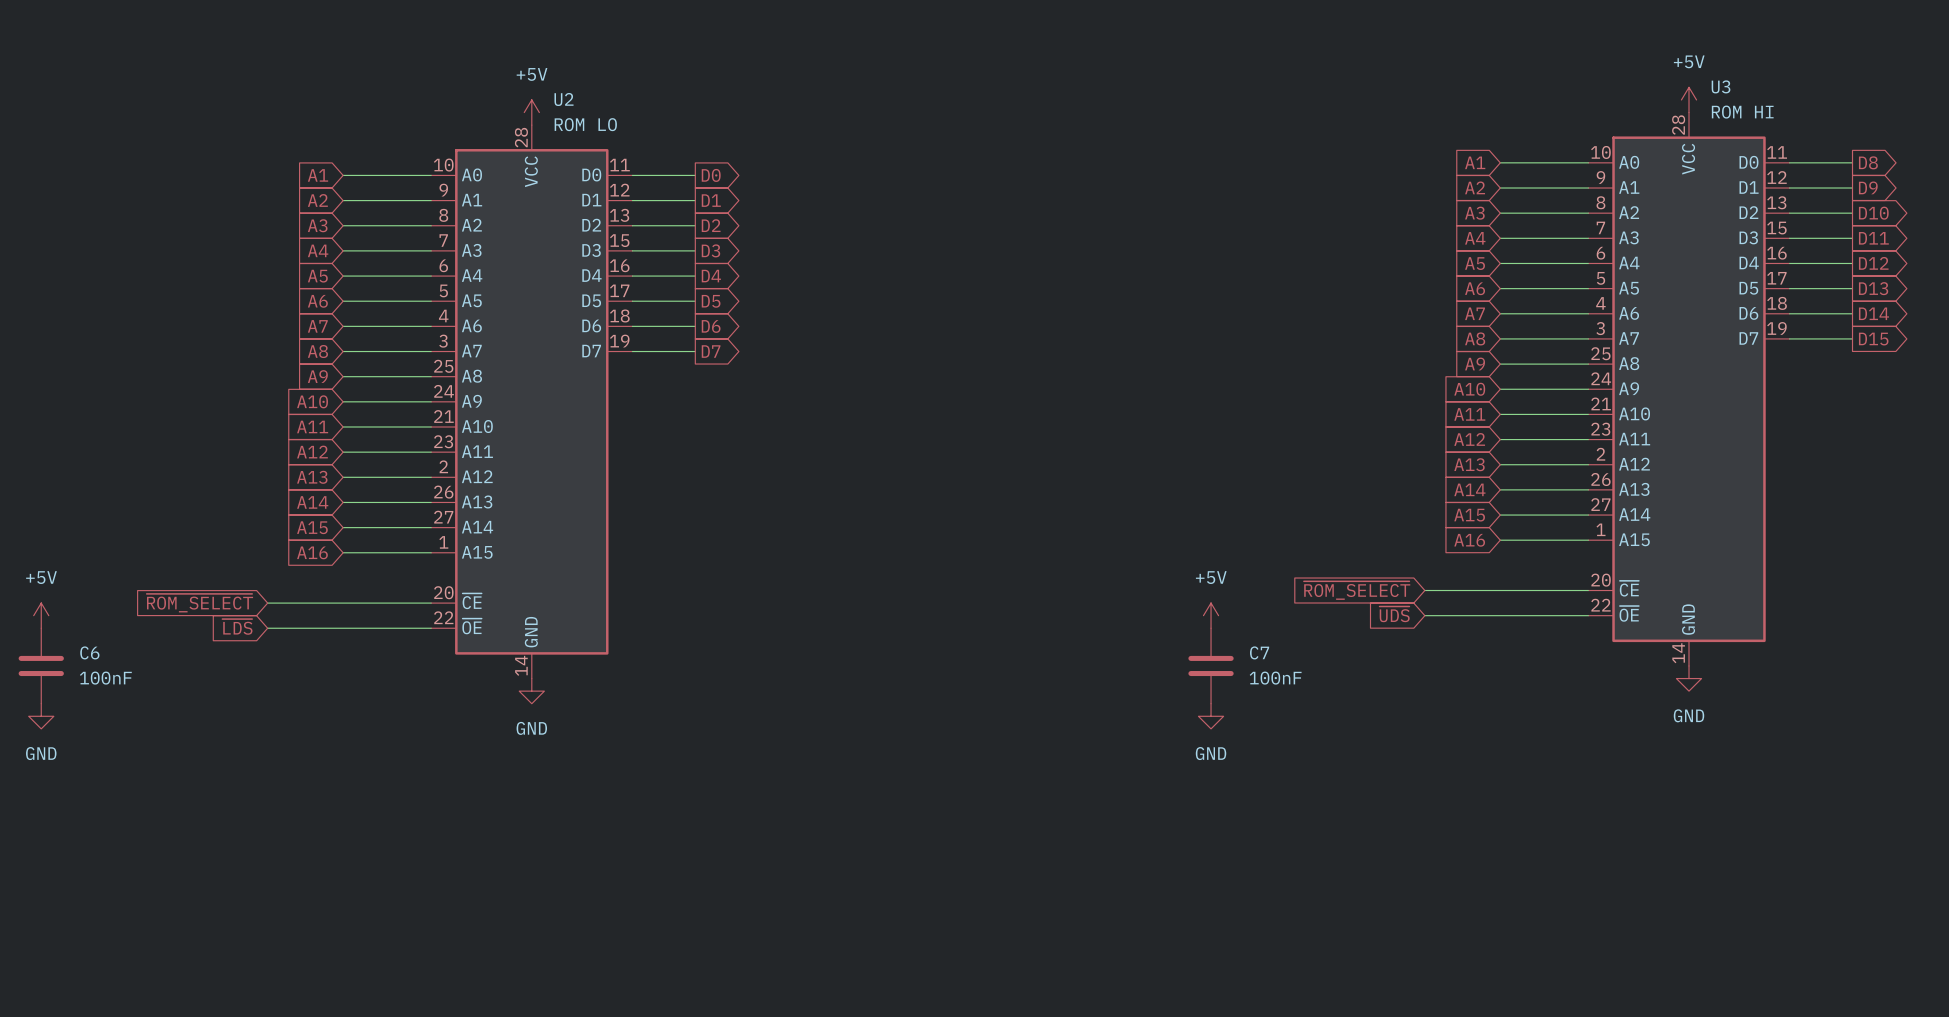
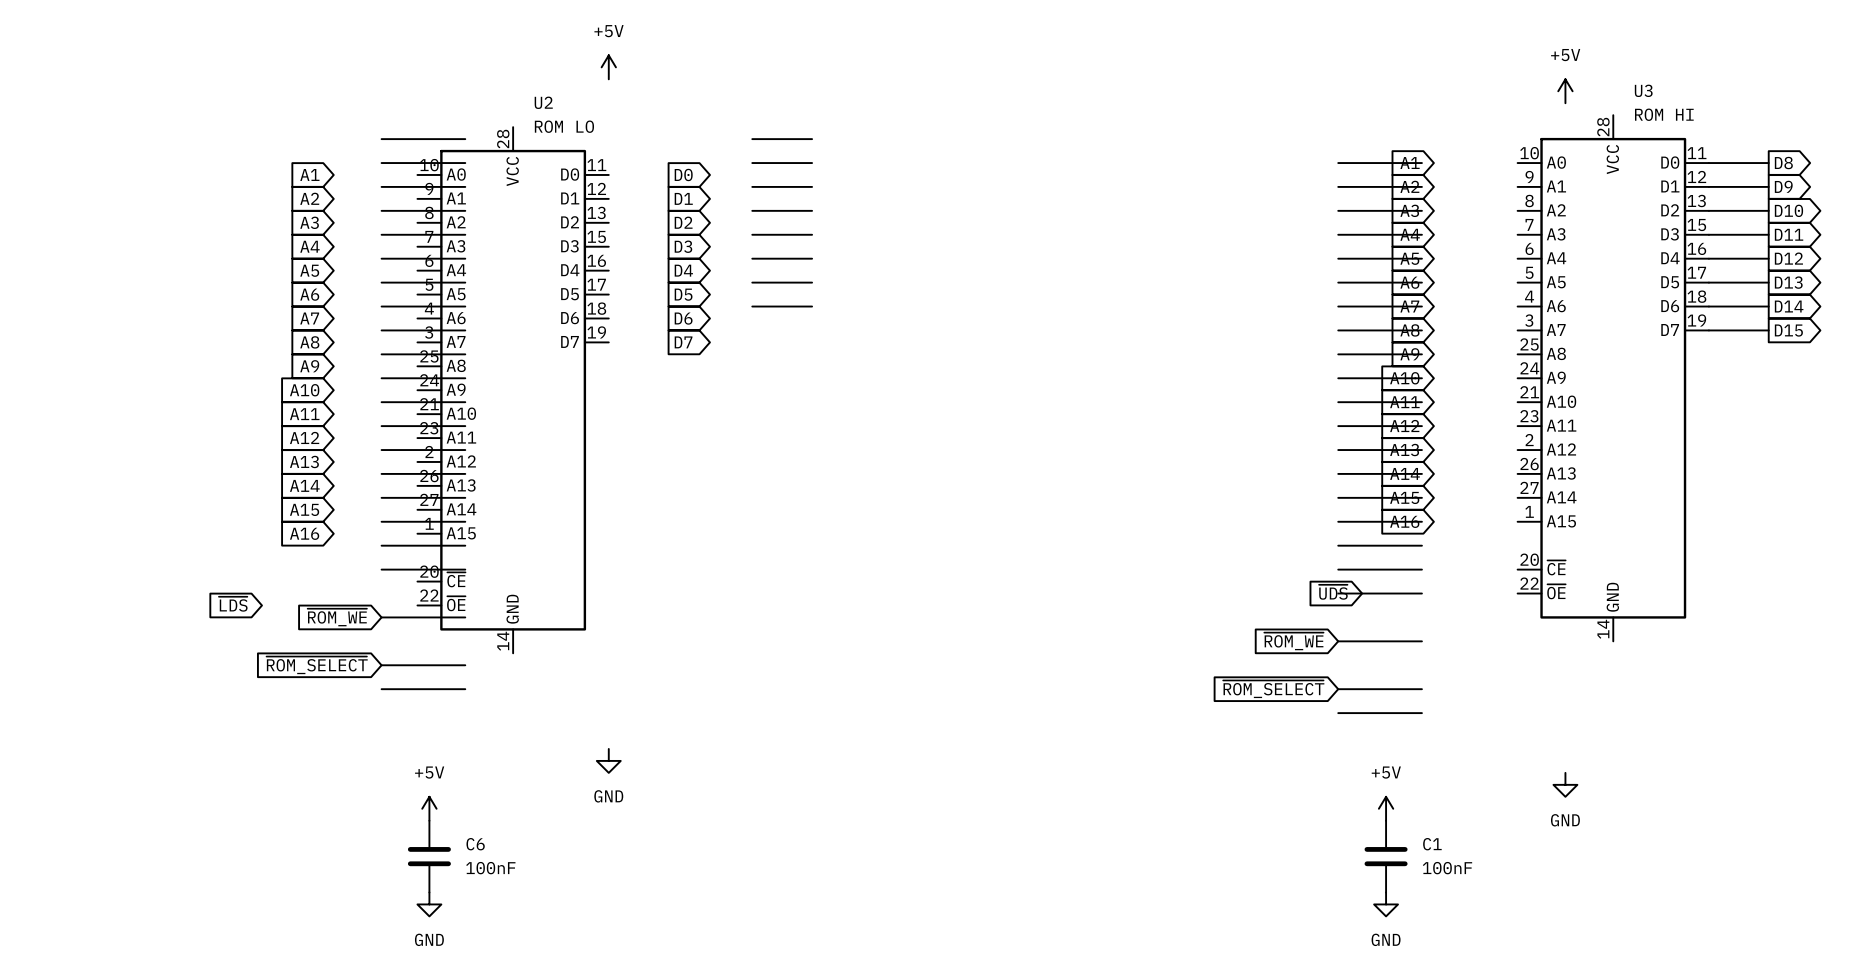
power symbol position: +5V (1688, 99) -> +5V (1565, 91)
power symbol position: +5V (531, 112) -> +5V (608, 67)
wire: none -> (381, 139) (465, 139)
wire: (1500, 162) (1588, 162) -> (1338, 163) (1421, 163)
wire: (343, 175) (431, 175) -> (381, 163) (465, 163)
wire: (632, 175) (695, 175) -> (752, 139) (812, 139)
wire: none -> (381, 186) (465, 186)
wire: (1500, 188) (1588, 188) -> (1338, 186) (1421, 186)
wire: (343, 200) (431, 200) -> (381, 210) (465, 210)
wire: (632, 200) (695, 200) -> (752, 163) (812, 163)
wire: (1500, 213) (1588, 213) -> (1338, 210) (1421, 210)
wire: (343, 225) (431, 225) -> (381, 234) (465, 234)
wire: (632, 225) (695, 225) -> (752, 186) (812, 186)
wire: (1500, 238) (1588, 238) -> (1338, 234) (1421, 234)
wire: (343, 250) (431, 250) -> (381, 258) (465, 258)
wire: (632, 250) (695, 250) -> (752, 210) (812, 210)
wire: (1500, 263) (1588, 263) -> (1338, 258) (1421, 258)
wire: (343, 276) (431, 276) -> (381, 282) (465, 282)
wire: (632, 276) (695, 276) -> (752, 234) (812, 234)
wire: (1500, 288) (1588, 288) -> (1338, 282) (1421, 282)
wire: (343, 301) (431, 301) -> (381, 306) (465, 306)
wire: (632, 301) (695, 301) -> (752, 258) (812, 258)
wire: (1500, 313) (1588, 313) -> (1338, 306) (1421, 306)
wire: (343, 326) (431, 326) -> (381, 402) (465, 402)
wire: (632, 326) (695, 326) -> (752, 282) (812, 282)
wire: (1500, 338) (1588, 338) -> (1338, 330) (1421, 330)
wire: (343, 351) (431, 351) -> (381, 330) (465, 330)
wire: (632, 351) (695, 351) -> (752, 306) (812, 306)
wire: (1500, 364) (1588, 364) -> (1338, 354) (1421, 354)
wire: (343, 376) (431, 376) -> (381, 354) (465, 354)
wire: (1500, 389) (1588, 389) -> (1338, 378) (1421, 378)
wire: (343, 401) (431, 401) -> (381, 378) (465, 378)
wire: (1500, 414) (1588, 414) -> (1338, 402) (1421, 402)
wire: (343, 426) (431, 426) -> (381, 426) (465, 426)
wire: (1500, 439) (1588, 439) -> (1338, 426) (1421, 426)
wire: (343, 452) (431, 452) -> (381, 450) (465, 450)
wire: (1500, 464) (1588, 464) -> (1338, 450) (1421, 450)
wire: (343, 477) (431, 477) -> (381, 473) (465, 473)
wire: (1500, 489) (1588, 489) -> (1338, 473) (1421, 473)
wire: (343, 502) (431, 502) -> (381, 545) (465, 545)
wire: (1500, 515) (1588, 515) -> (1338, 497) (1421, 497)
wire: (343, 527) (431, 527) -> (381, 497) (465, 497)
wire: (1500, 540) (1588, 540) -> (1338, 521) (1421, 521)
wire: (343, 552) (431, 552) -> (381, 521) (465, 521)
wire: none -> (1338, 545) (1421, 545)
wire: none -> (381, 569) (465, 569)
global label position: ~{ROM_SELECT} (1357, 590) -> ~{ROM_SELECT} (1273, 689)
wire: none -> (1338, 569) (1362, 569)
wire: (1487, 590) (1588, 590) -> none
global label position: ~{ROM_SELECT} (199, 603) -> ~{ROM_SELECT} (317, 665)
wire: (267, 603) (431, 603) -> none
power symbol: +5V (41, 615) -> none
power symbol: +5V (1211, 615) -> none
wire: none -> (1338, 593) (1362, 593)
wire: (1487, 615) (1588, 615) -> none
wire: (267, 628) (431, 628) -> none
global label: none -> ~{ROM_WE} (337, 617)
wire: none -> (381, 617) (465, 617)
C6 position: (41, 665) -> (429, 856)
C7: 100nF (1211, 665) -> none
wire: none -> (1338, 641) (1421, 641)
global label: none -> ~{ROM_WE} (1293, 641)
power symbol position: GND (1688, 678) -> GND (1565, 784)
wire: none -> (381, 665) (465, 665)
power symbol: GND (531, 691) -> none
power symbol: GND (41, 716) -> none
wire: none -> (381, 689) (465, 689)
power symbol: GND (1211, 716) -> none
wire: none -> (1338, 689) (1421, 689)
wire: none -> (1338, 713) (1421, 713)
power symbol: none -> GND (608, 760)
power symbol: none -> +5V (429, 808)
power symbol: none -> +5V (1386, 808)
C1: none -> 100nF (1386, 856)
power symbol: none -> GND (429, 904)
power symbol: none -> GND (1386, 904)

